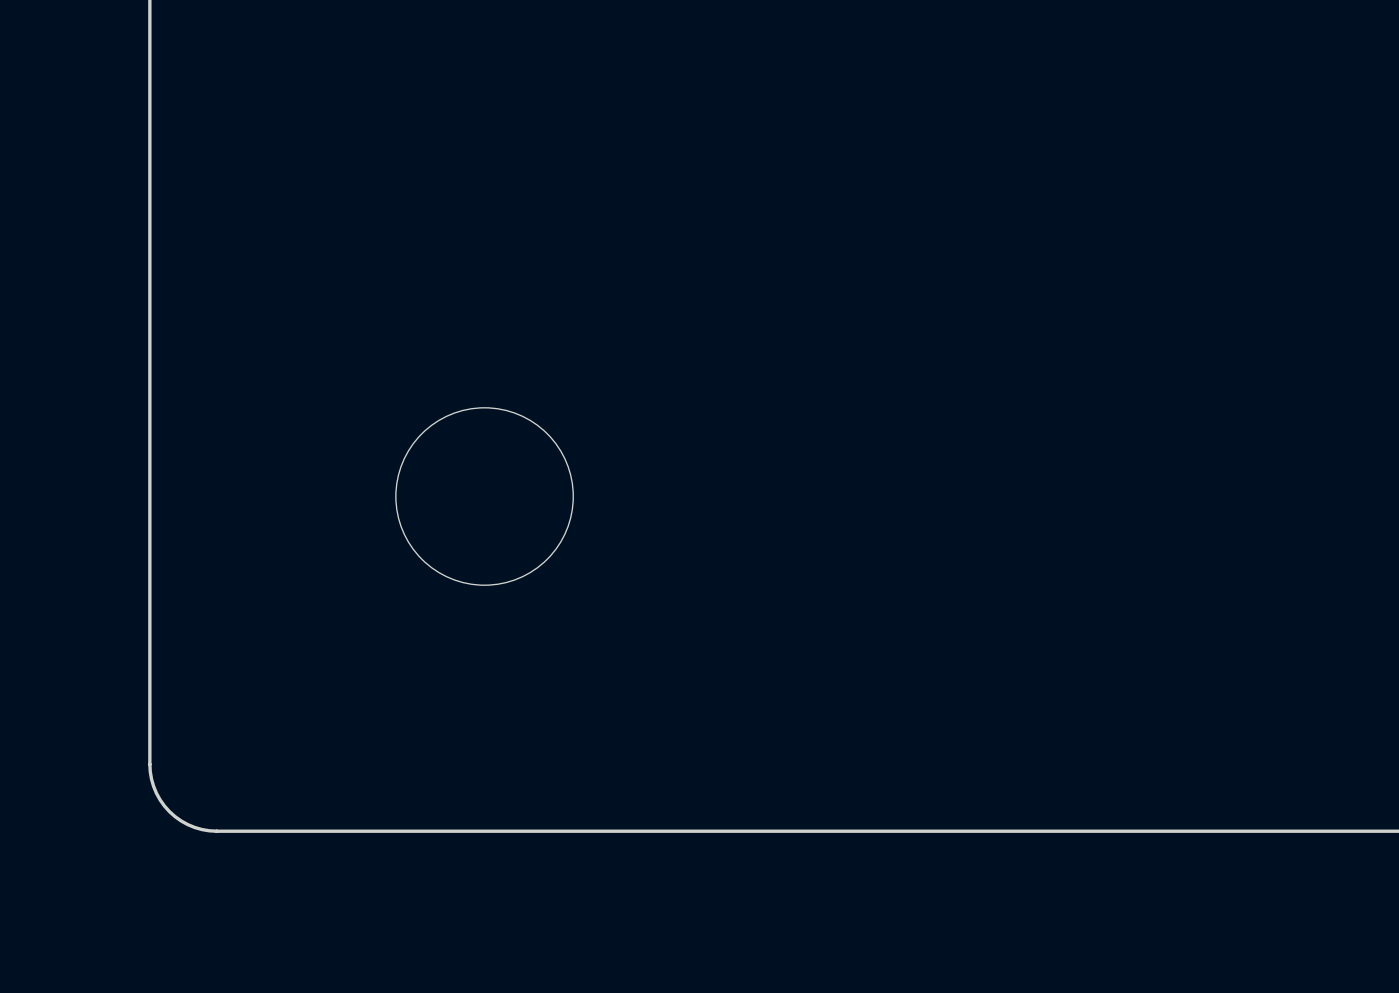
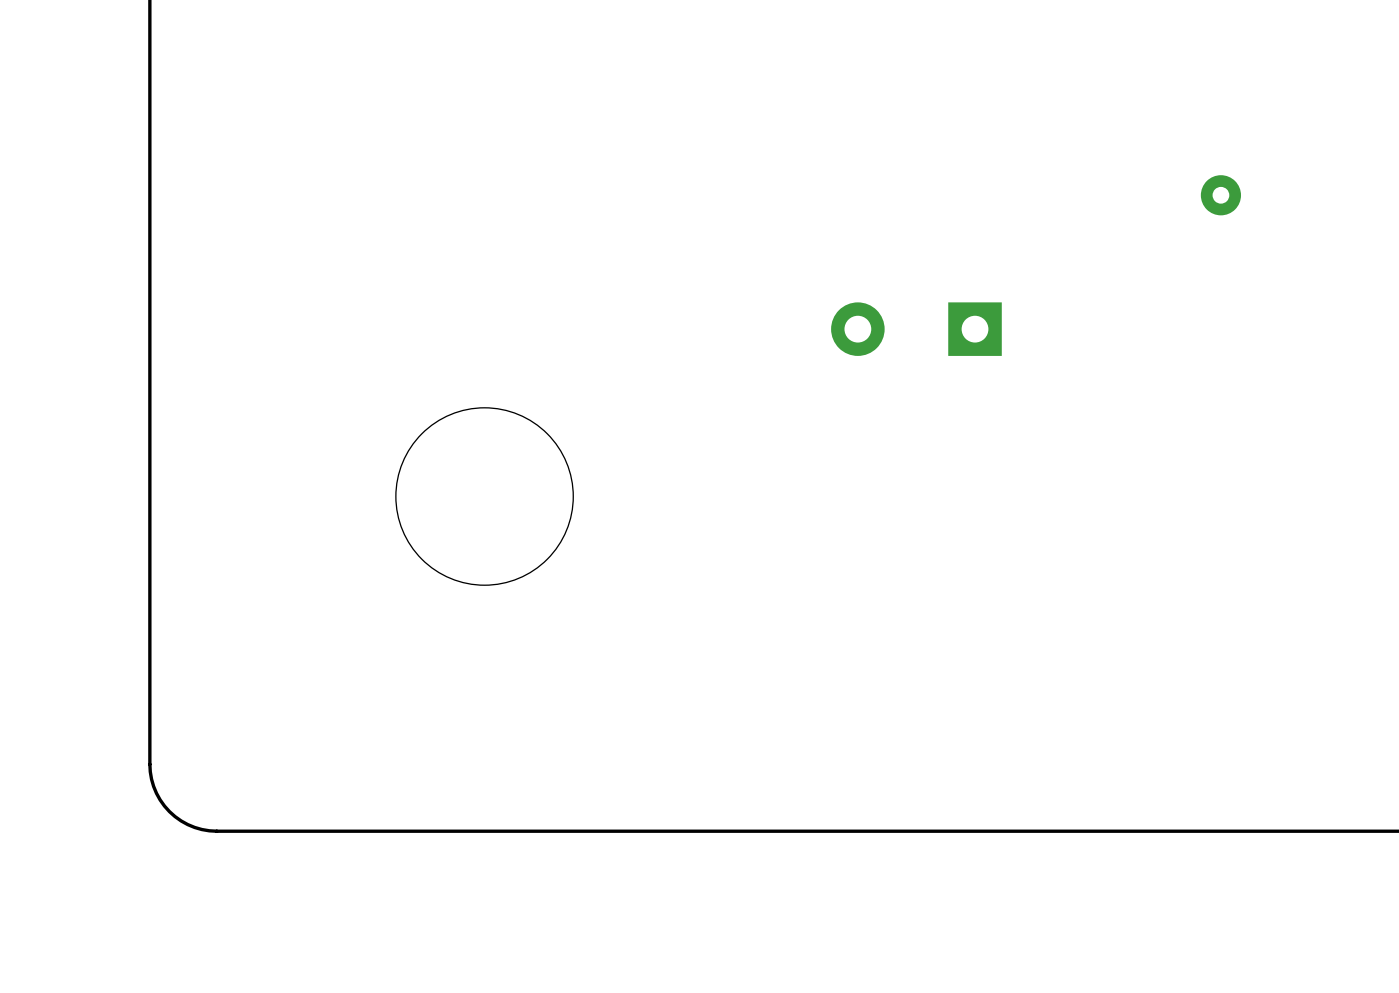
via: none -> (1220, 195)
part: none -> (916, 329)

